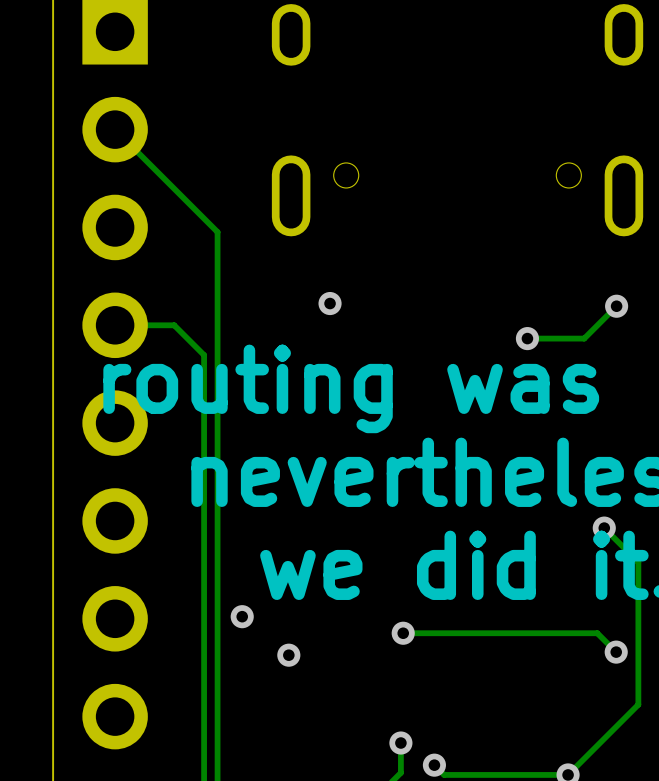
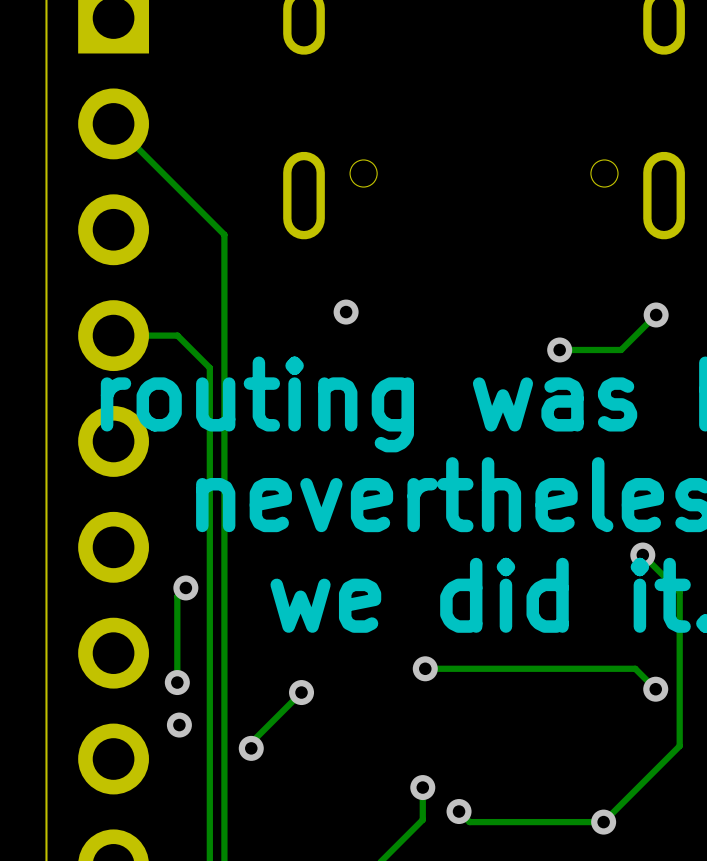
track: none -> (185, 587) (177, 596) (177, 682)
via: none -> (185, 587)
via: (242, 616) -> none
via: none -> (177, 682)
track: none -> (301, 692) (251, 742) (251, 748)
via: none -> (179, 725)
via: none -> (251, 748)

